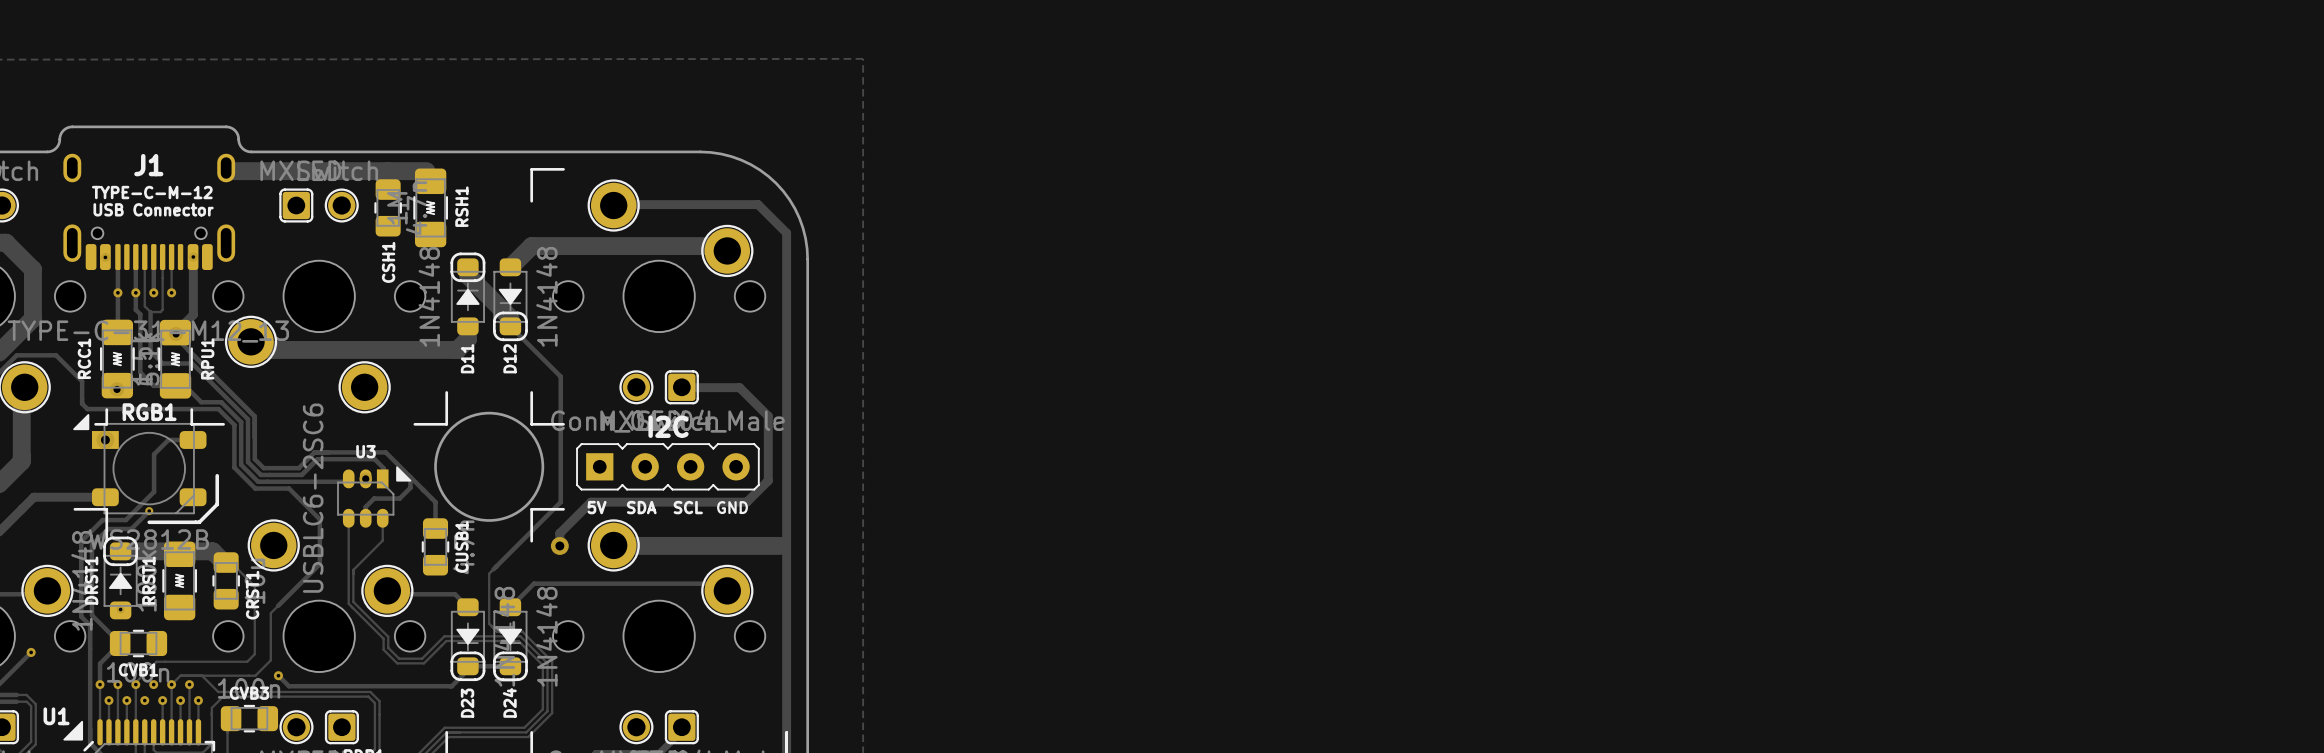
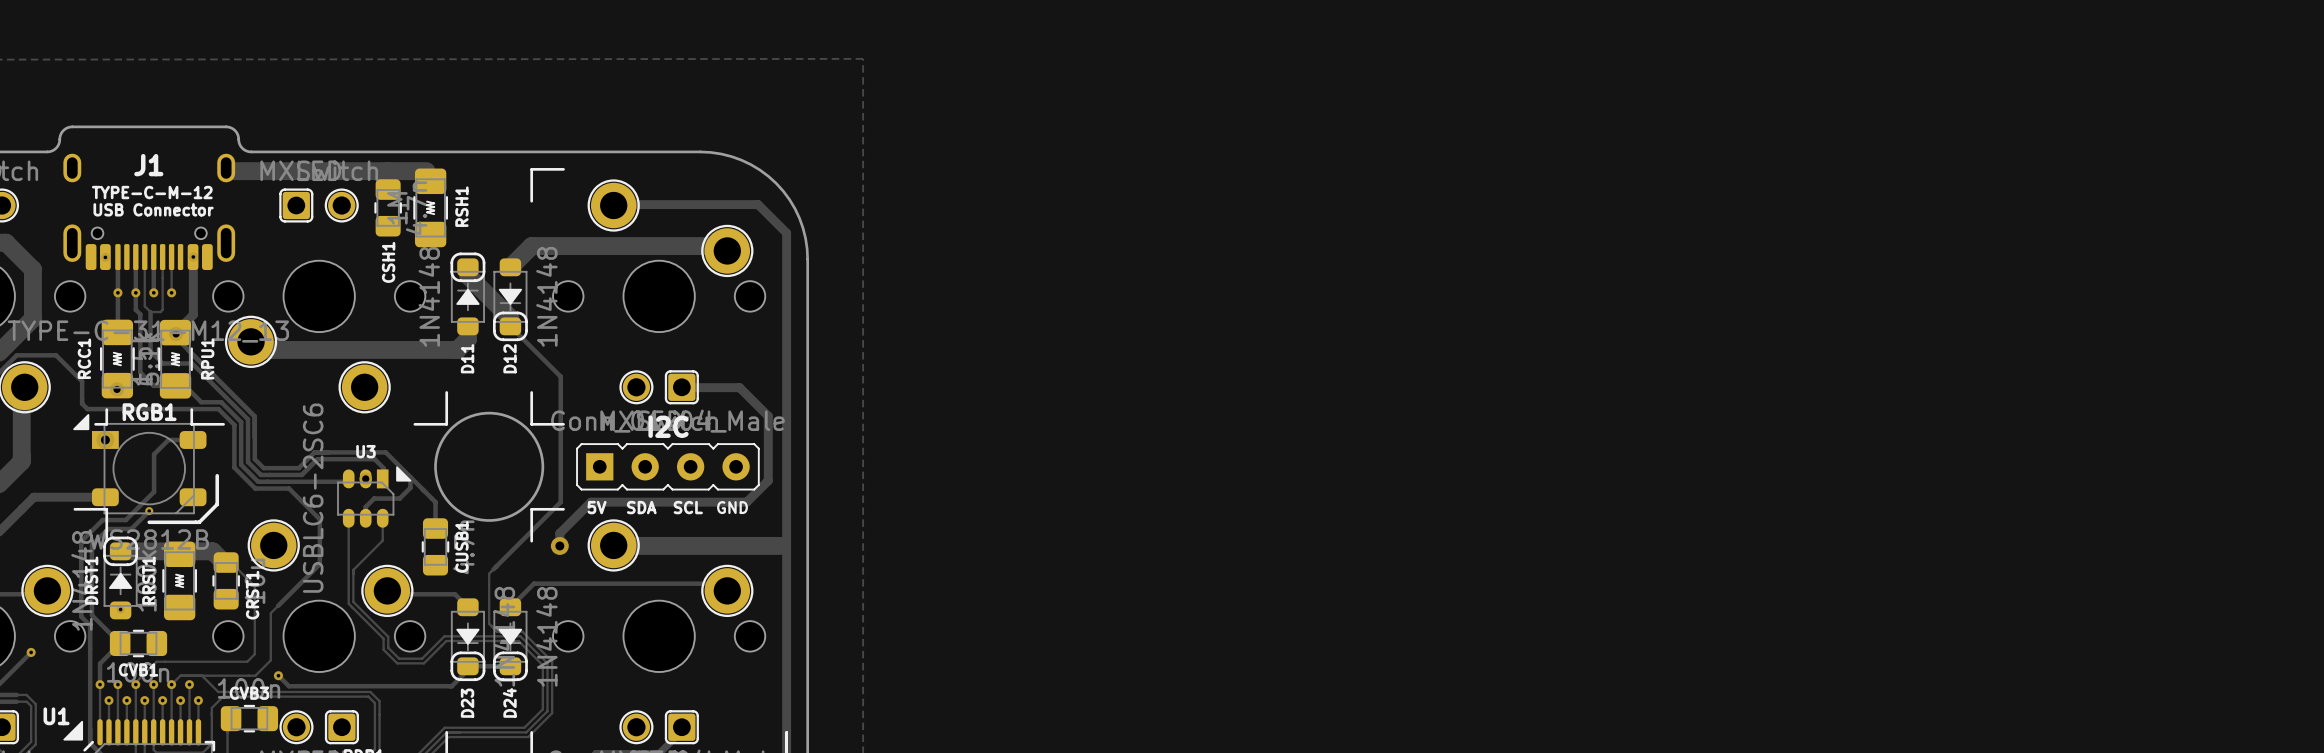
track: none -> (153, 684) (153, 728)
track: none -> (144, 700) (144, 728)

